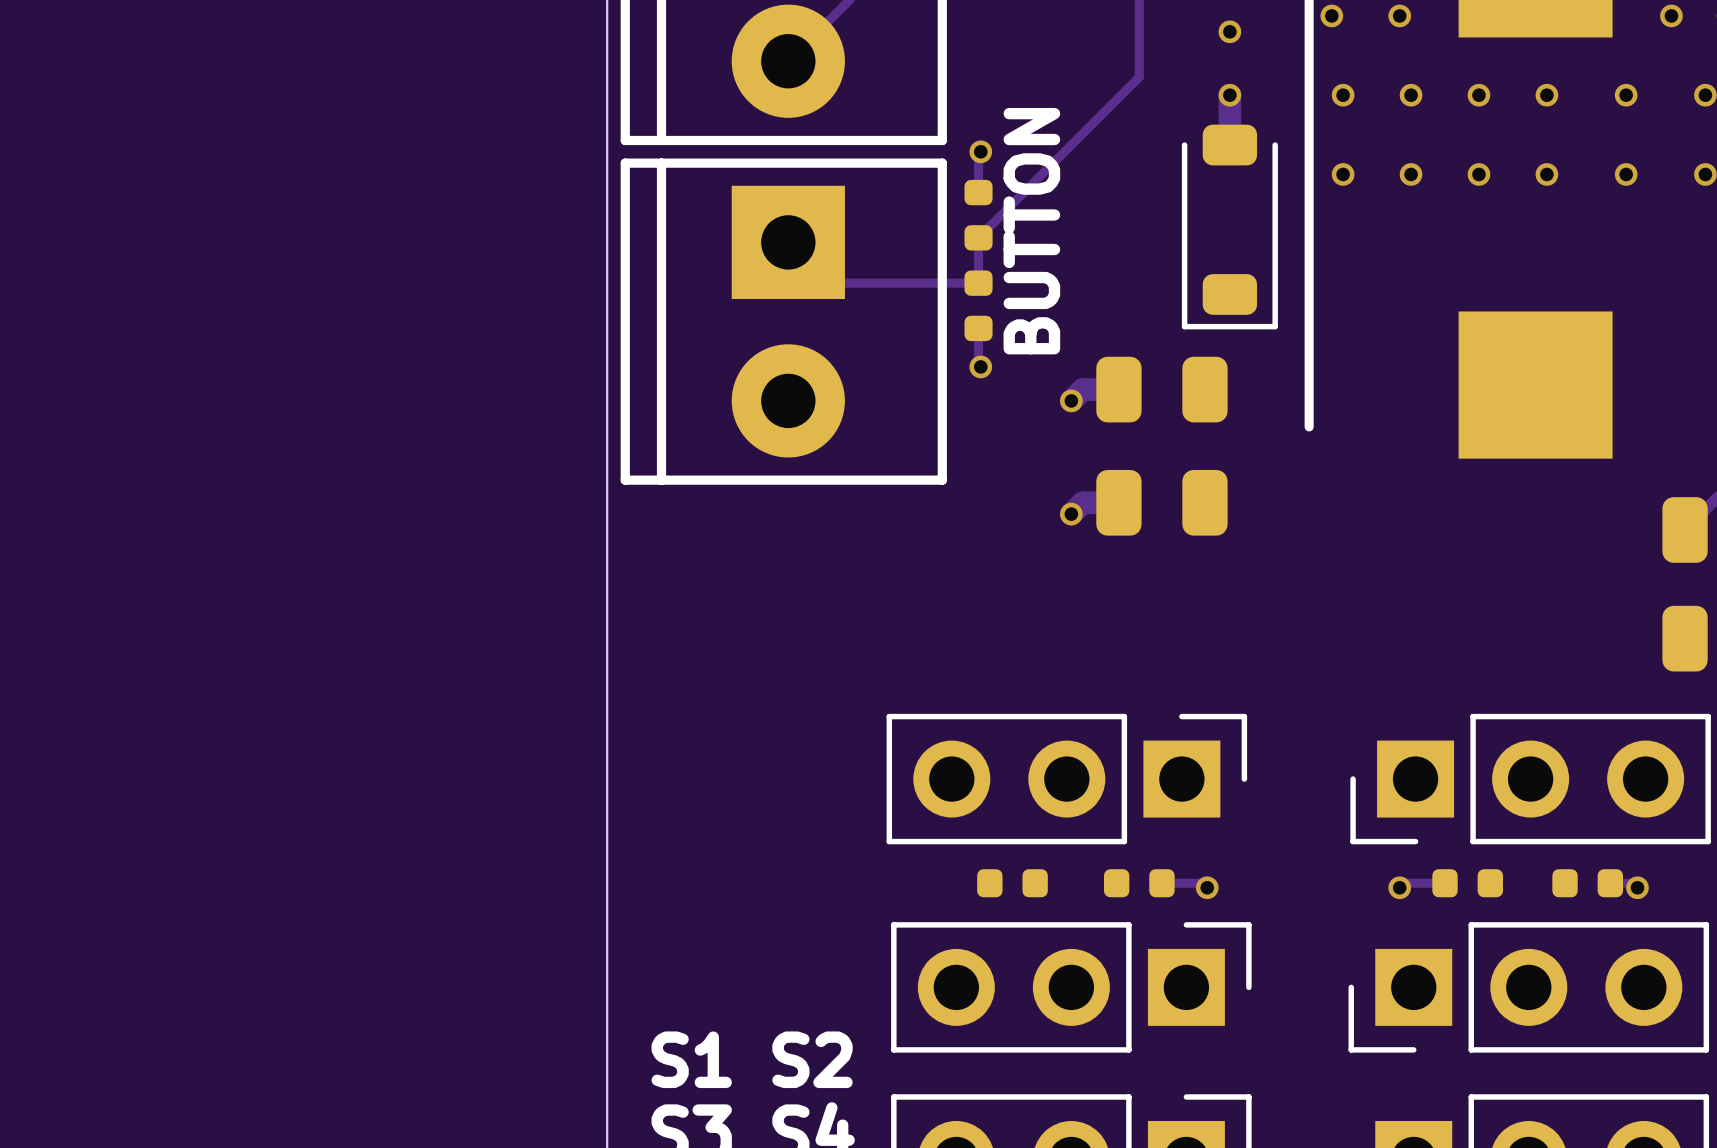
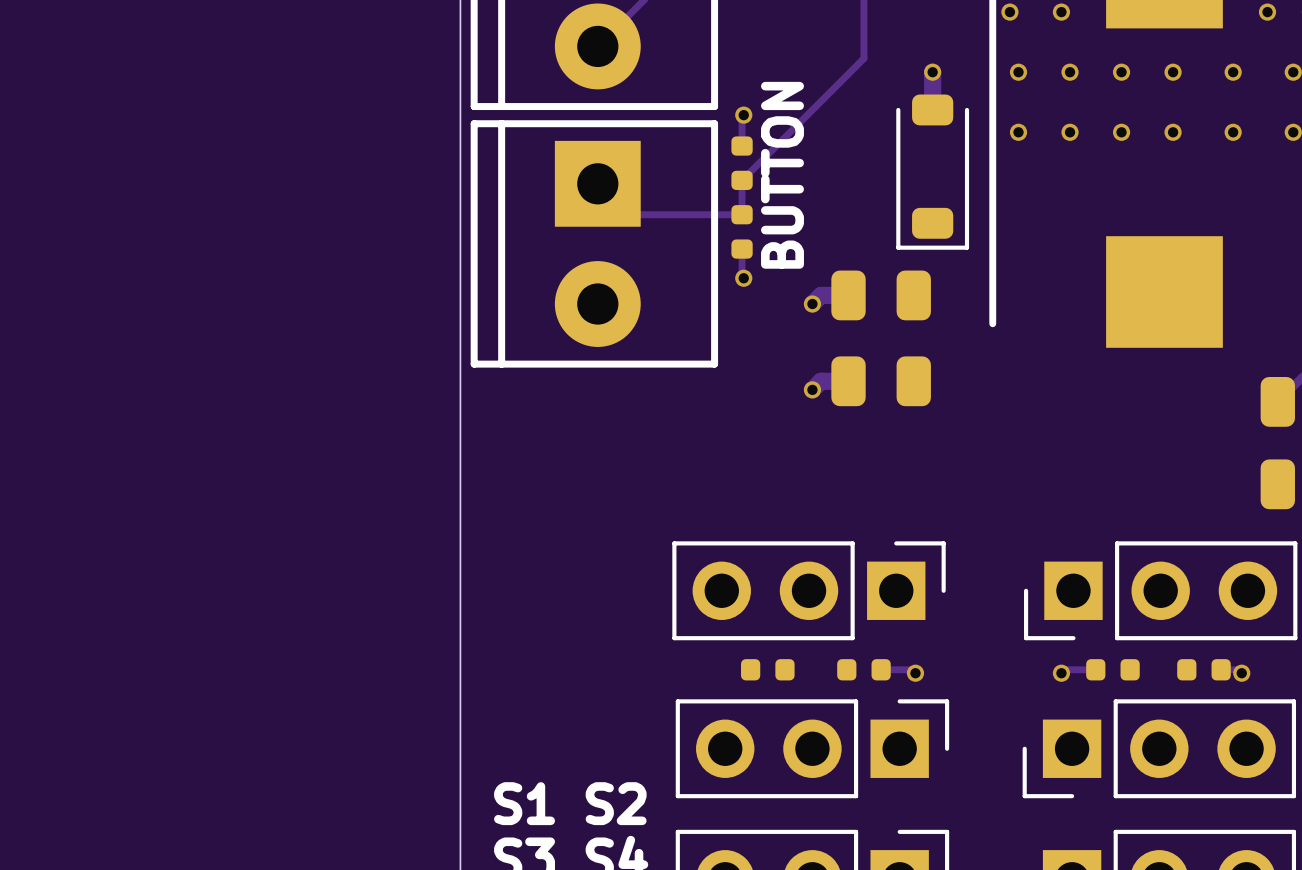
via: (1229, 31) -> none

